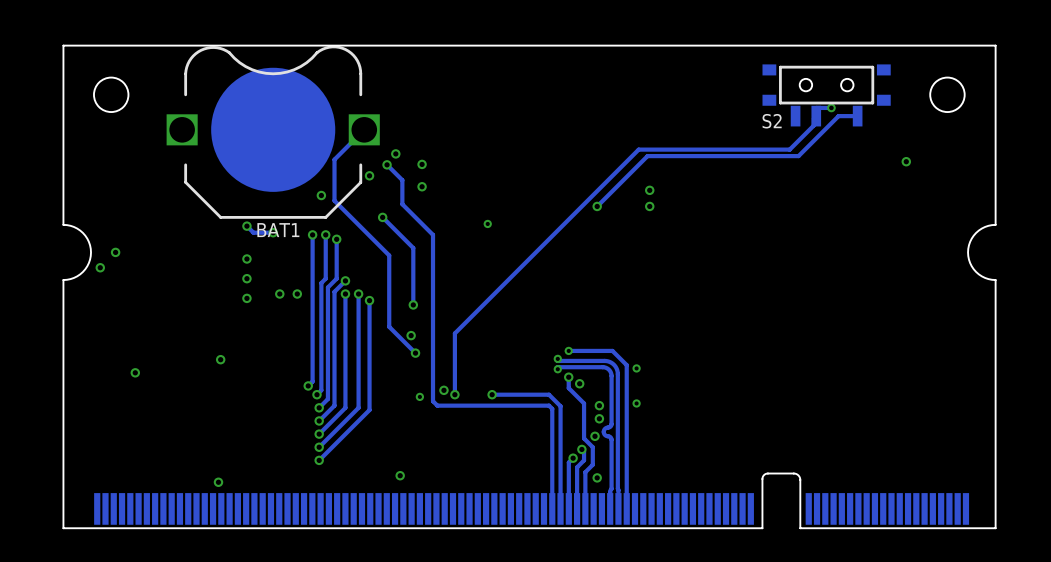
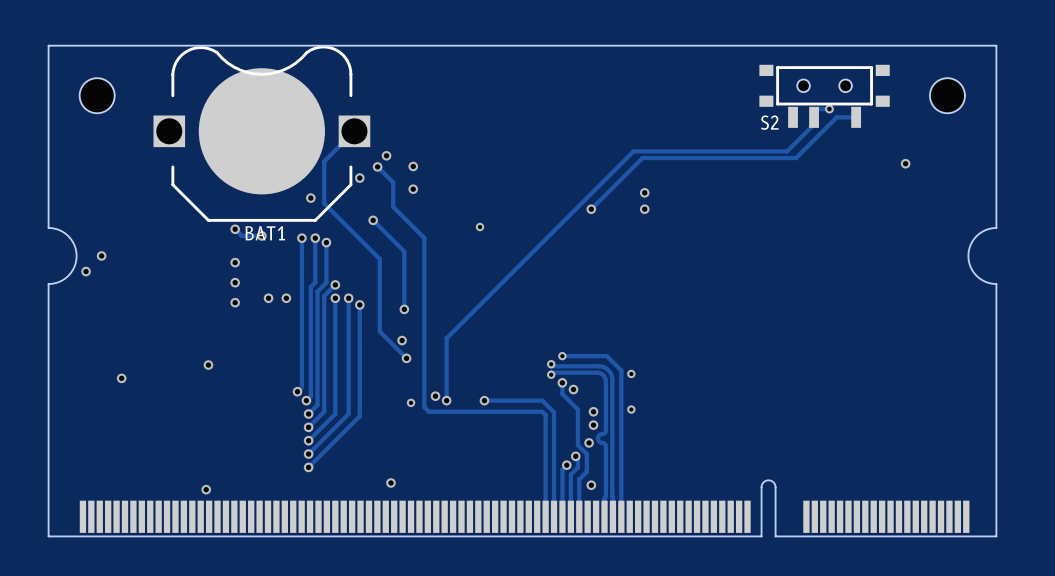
part footprint: [63, 45, 996, 529] -> [48, 45, 997, 537]

